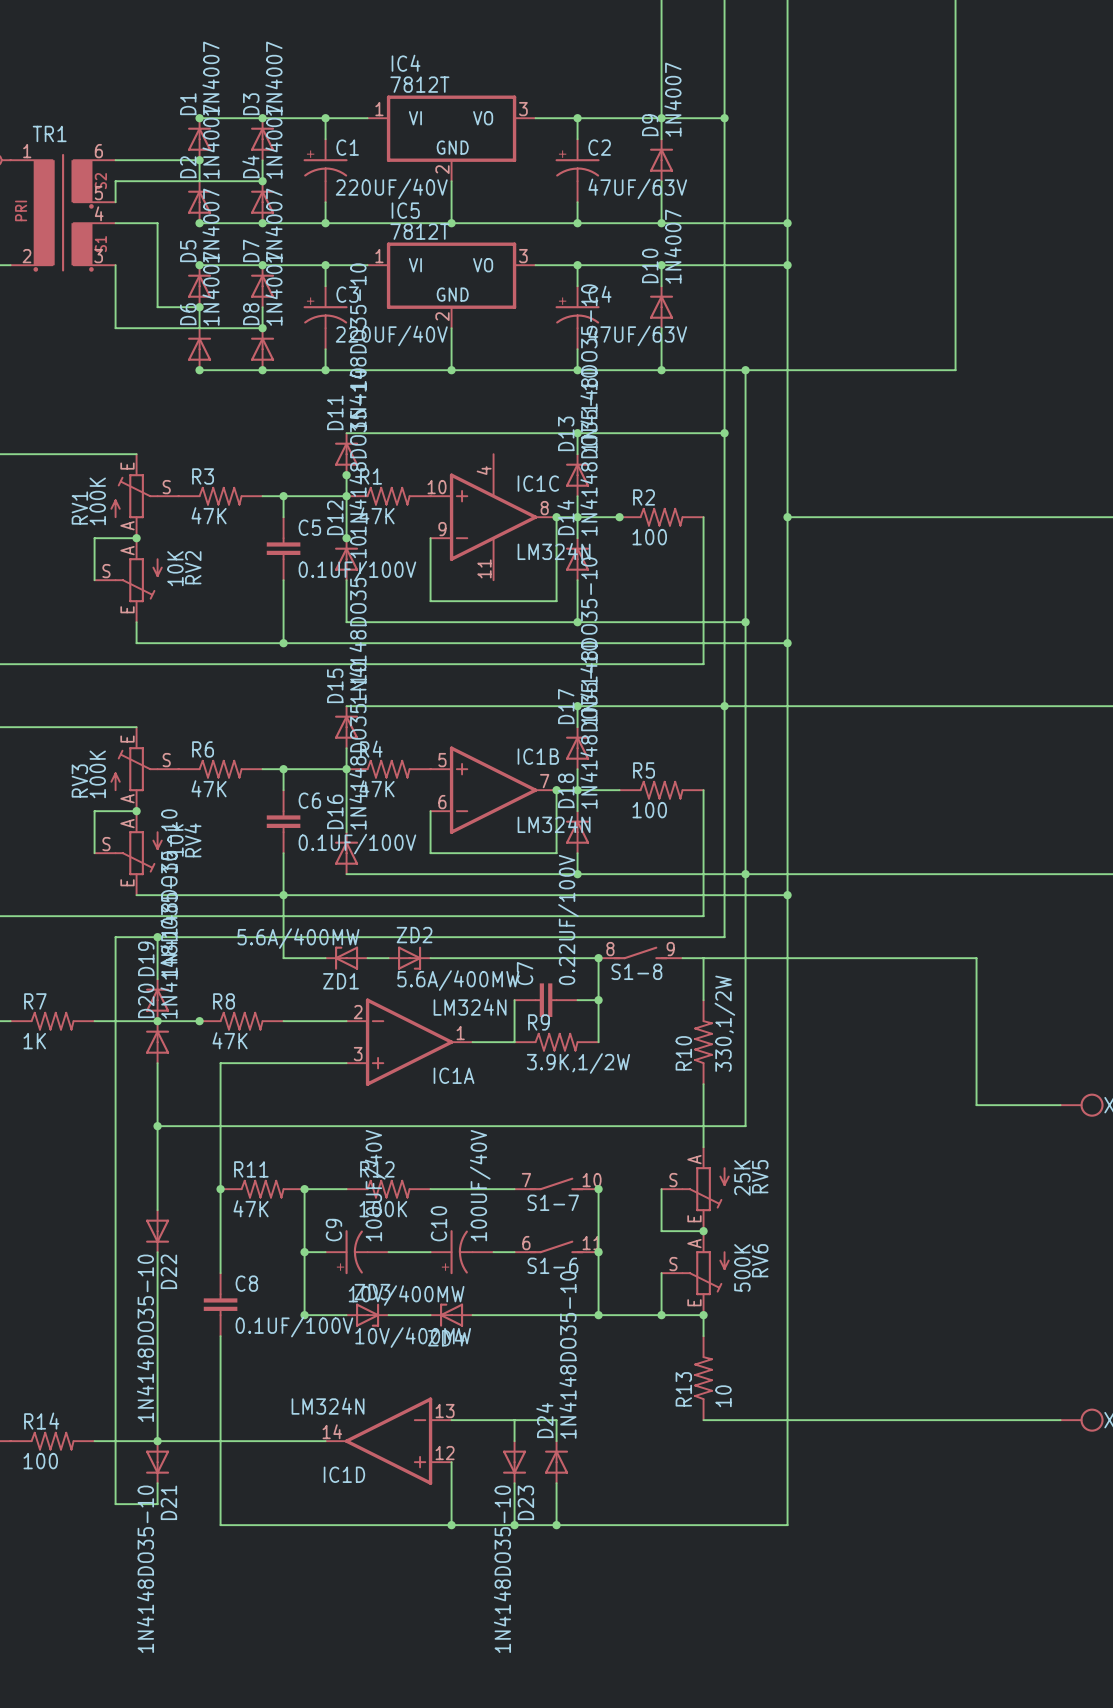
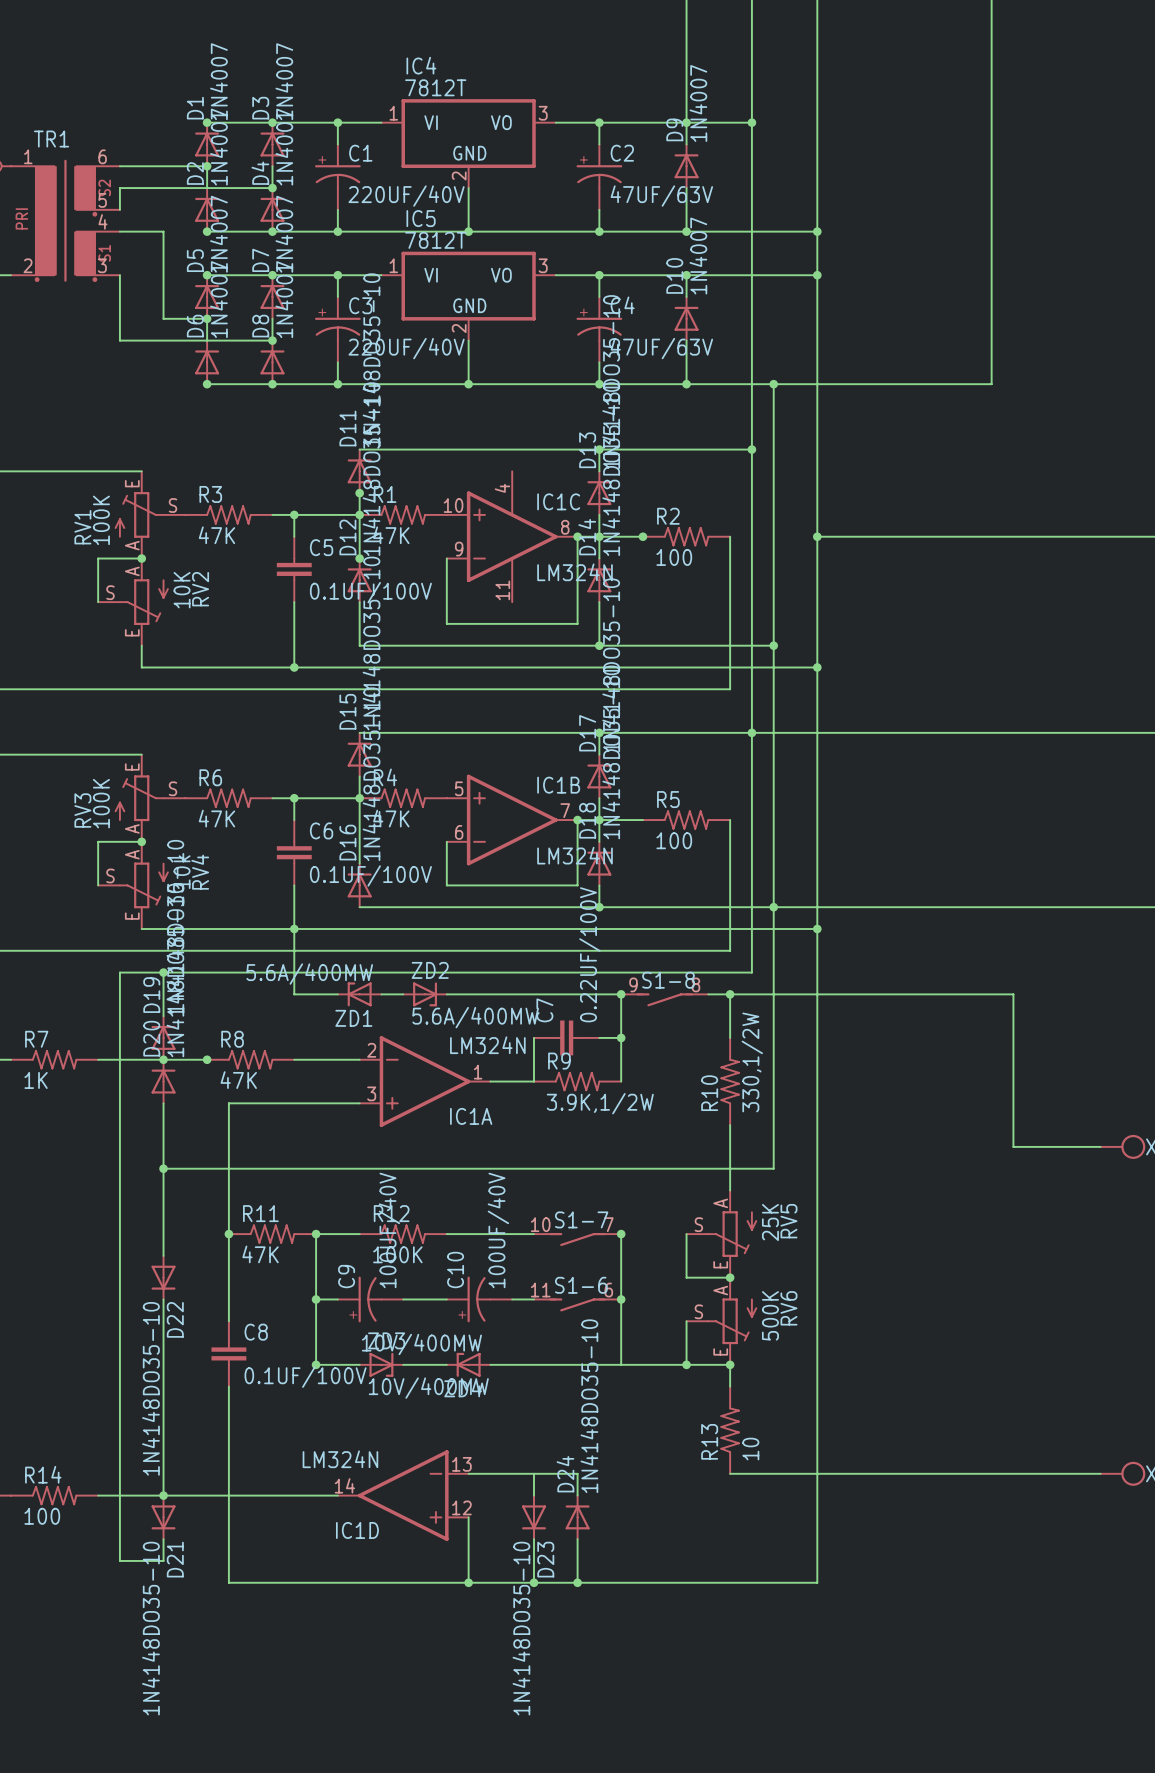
S1-8 rotation: 0° (640, 952) -> 180° (664, 999)
junction: none -> (730, 994)
S1-7 rotation: 0° (556, 1183) -> 180° (577, 1239)
S1-6 rotation: 0° (556, 1246) -> 180° (577, 1304)
junction: (598, 1315) -> none

